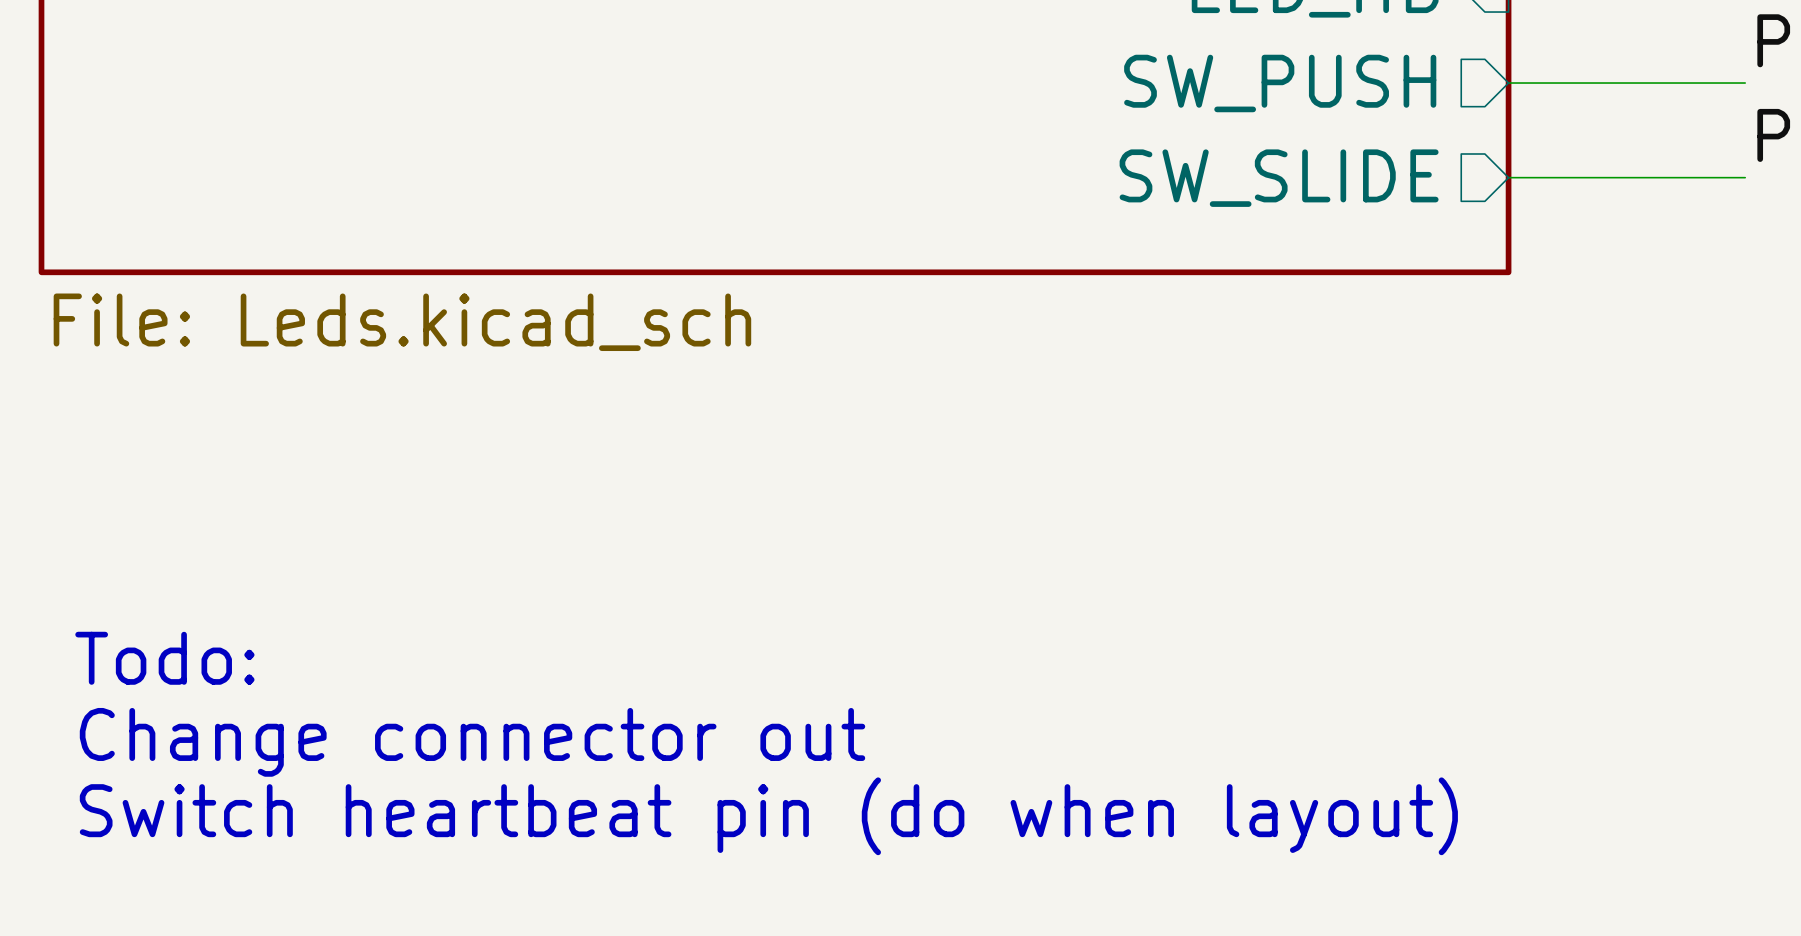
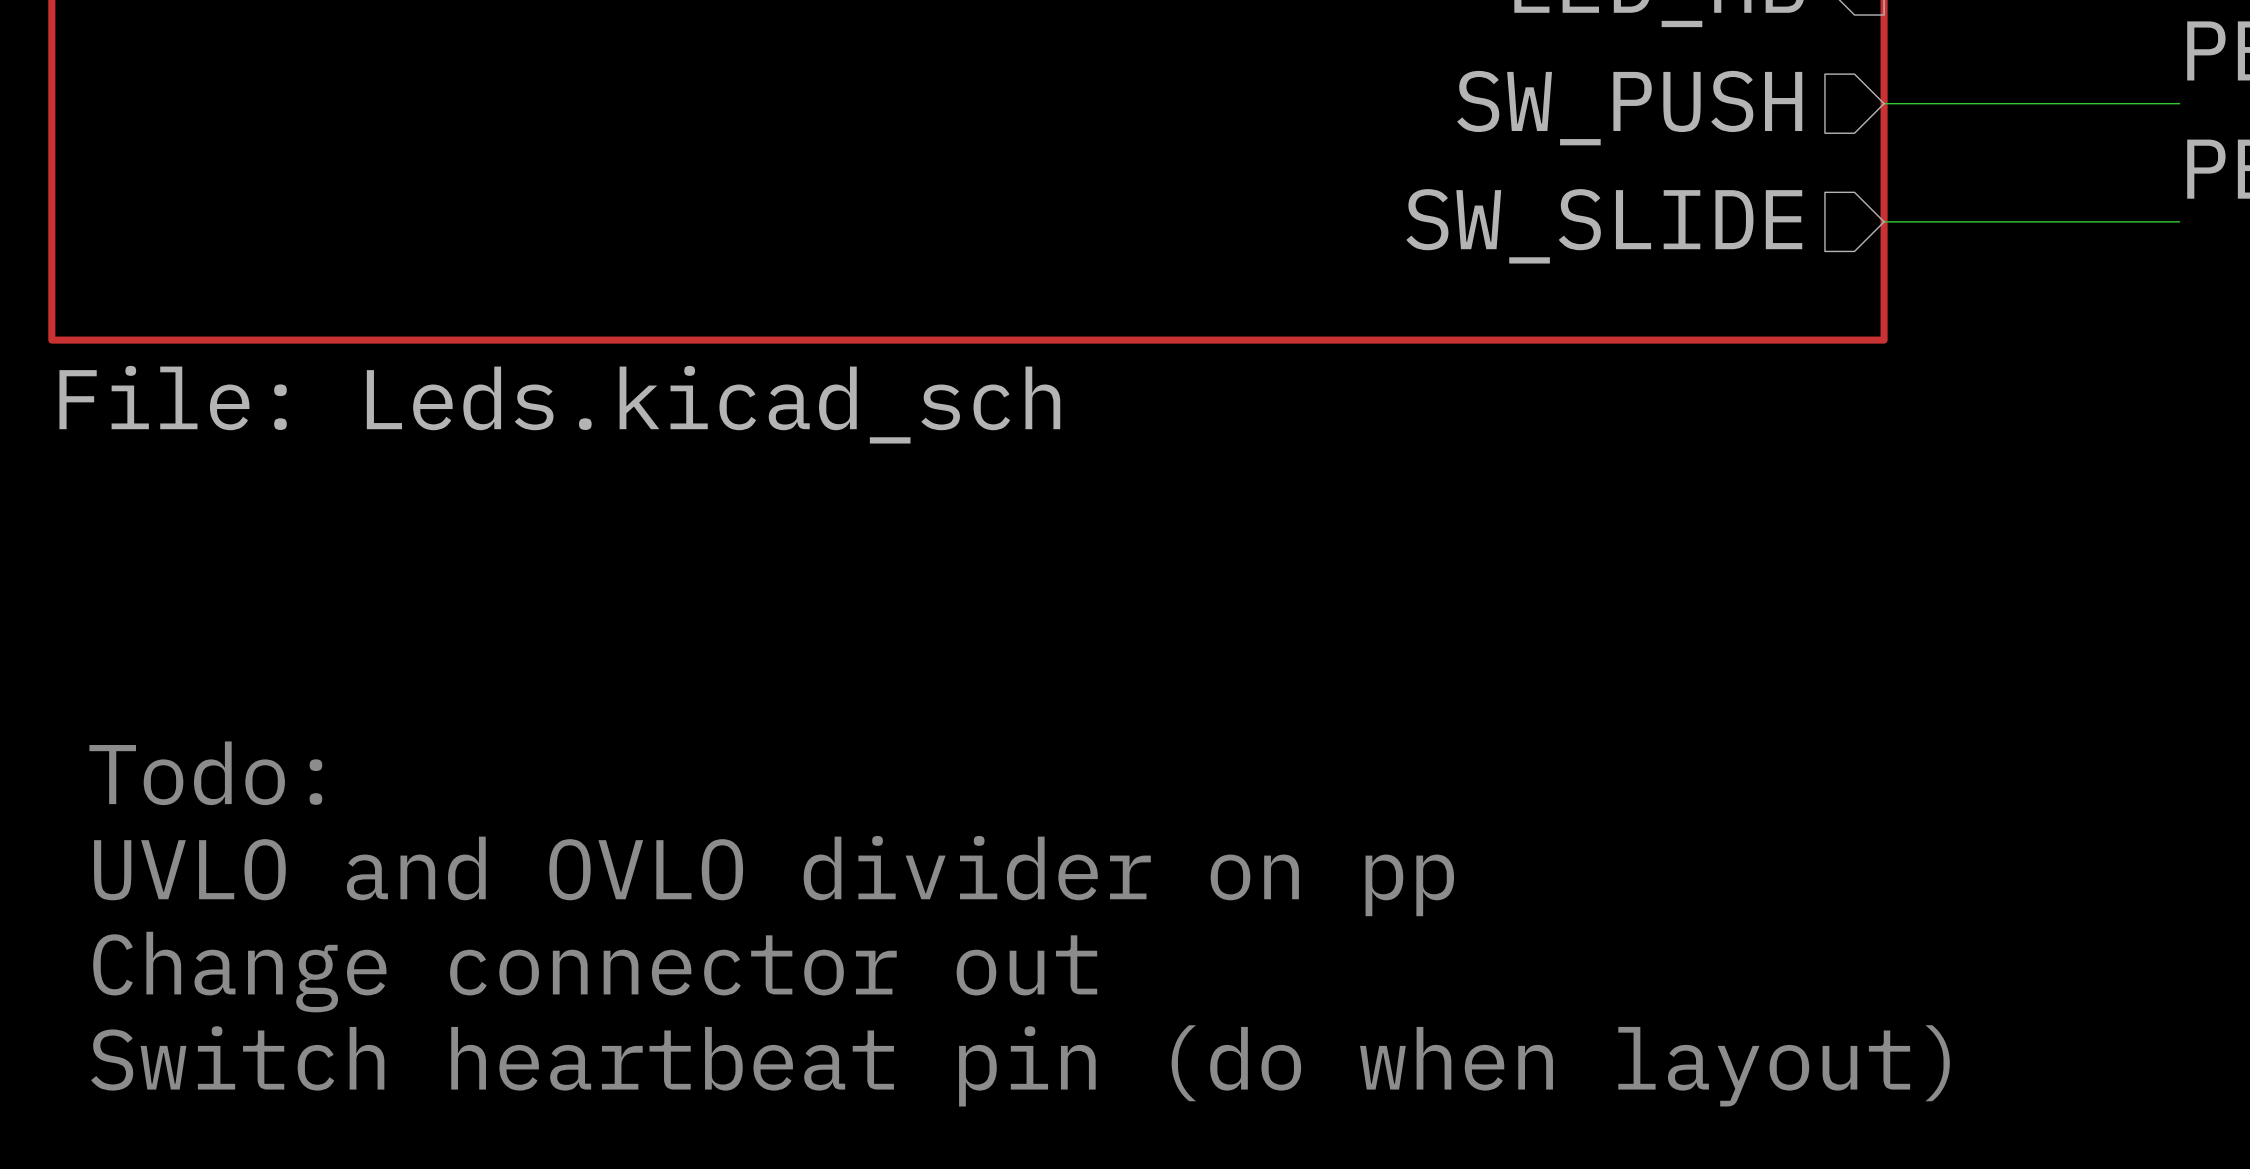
text position: Todo: (164, 658) -> Todo: (205, 773)
text: none -> UVLO and OVLO divider on pp (774, 876)
text position: Change connector out (472, 742) -> Change connector out (595, 972)
text position: Switch heartbeat pin (do when layout) (768, 816) -> Switch heartbeat pin (do when layout) (1020, 1065)

